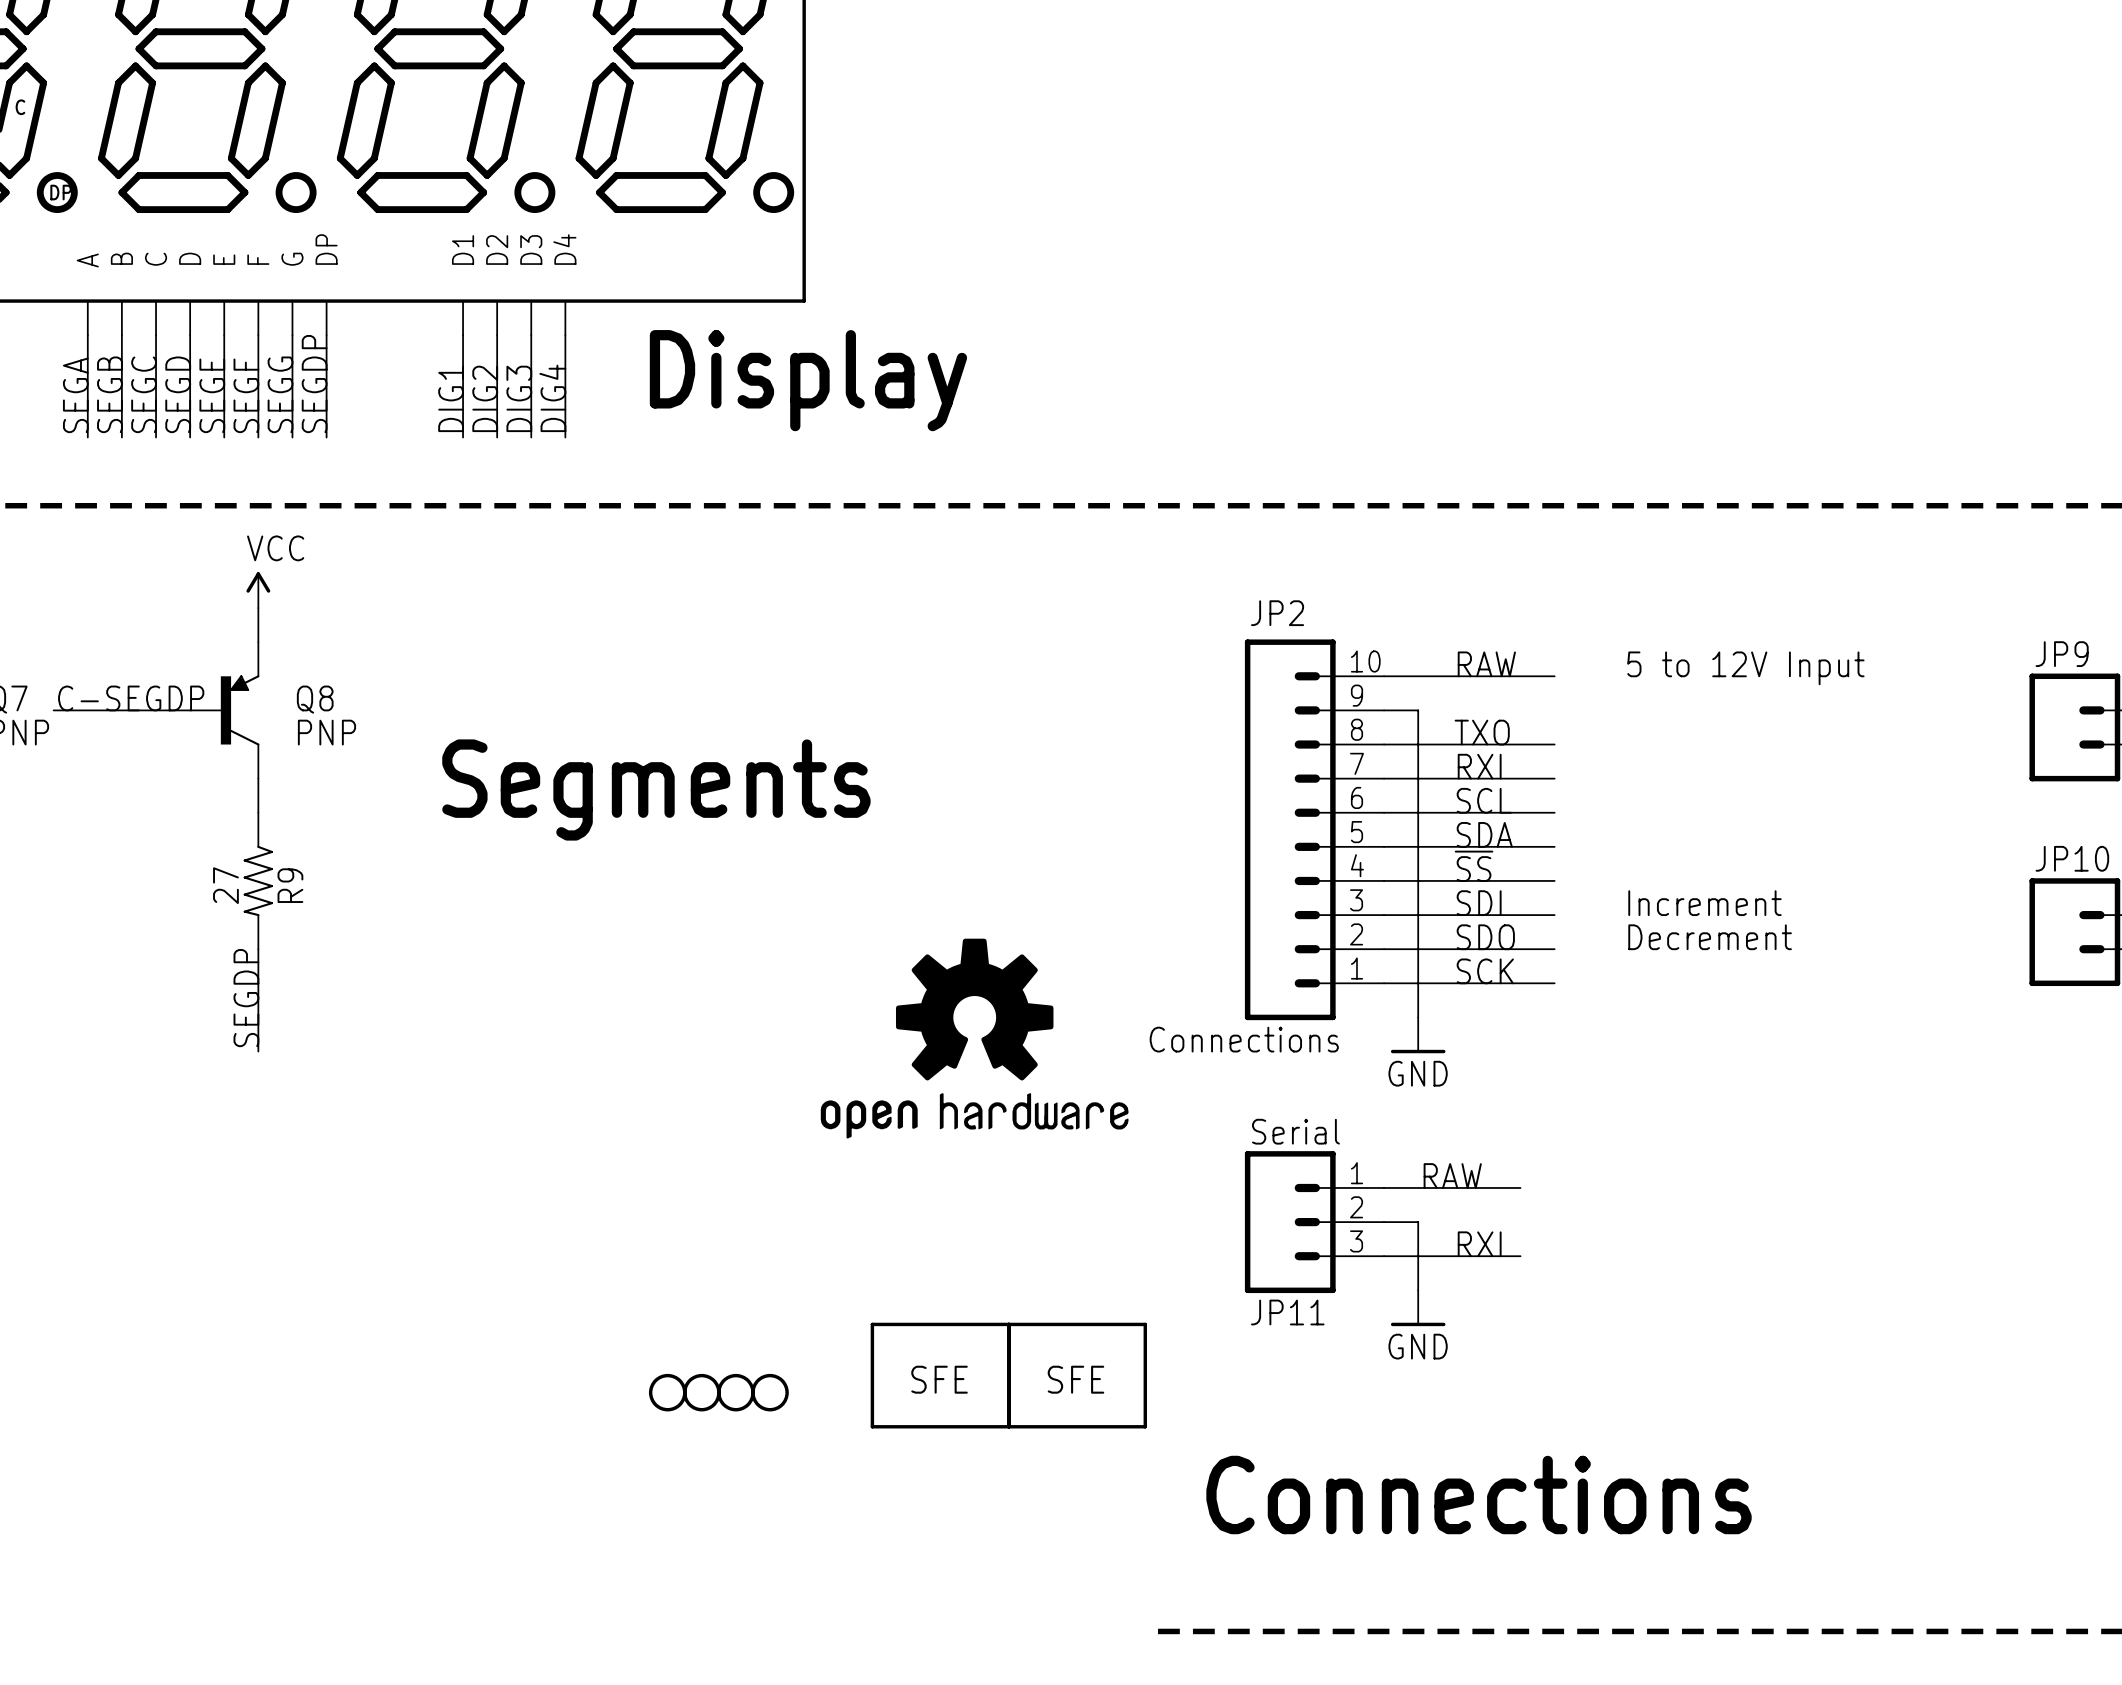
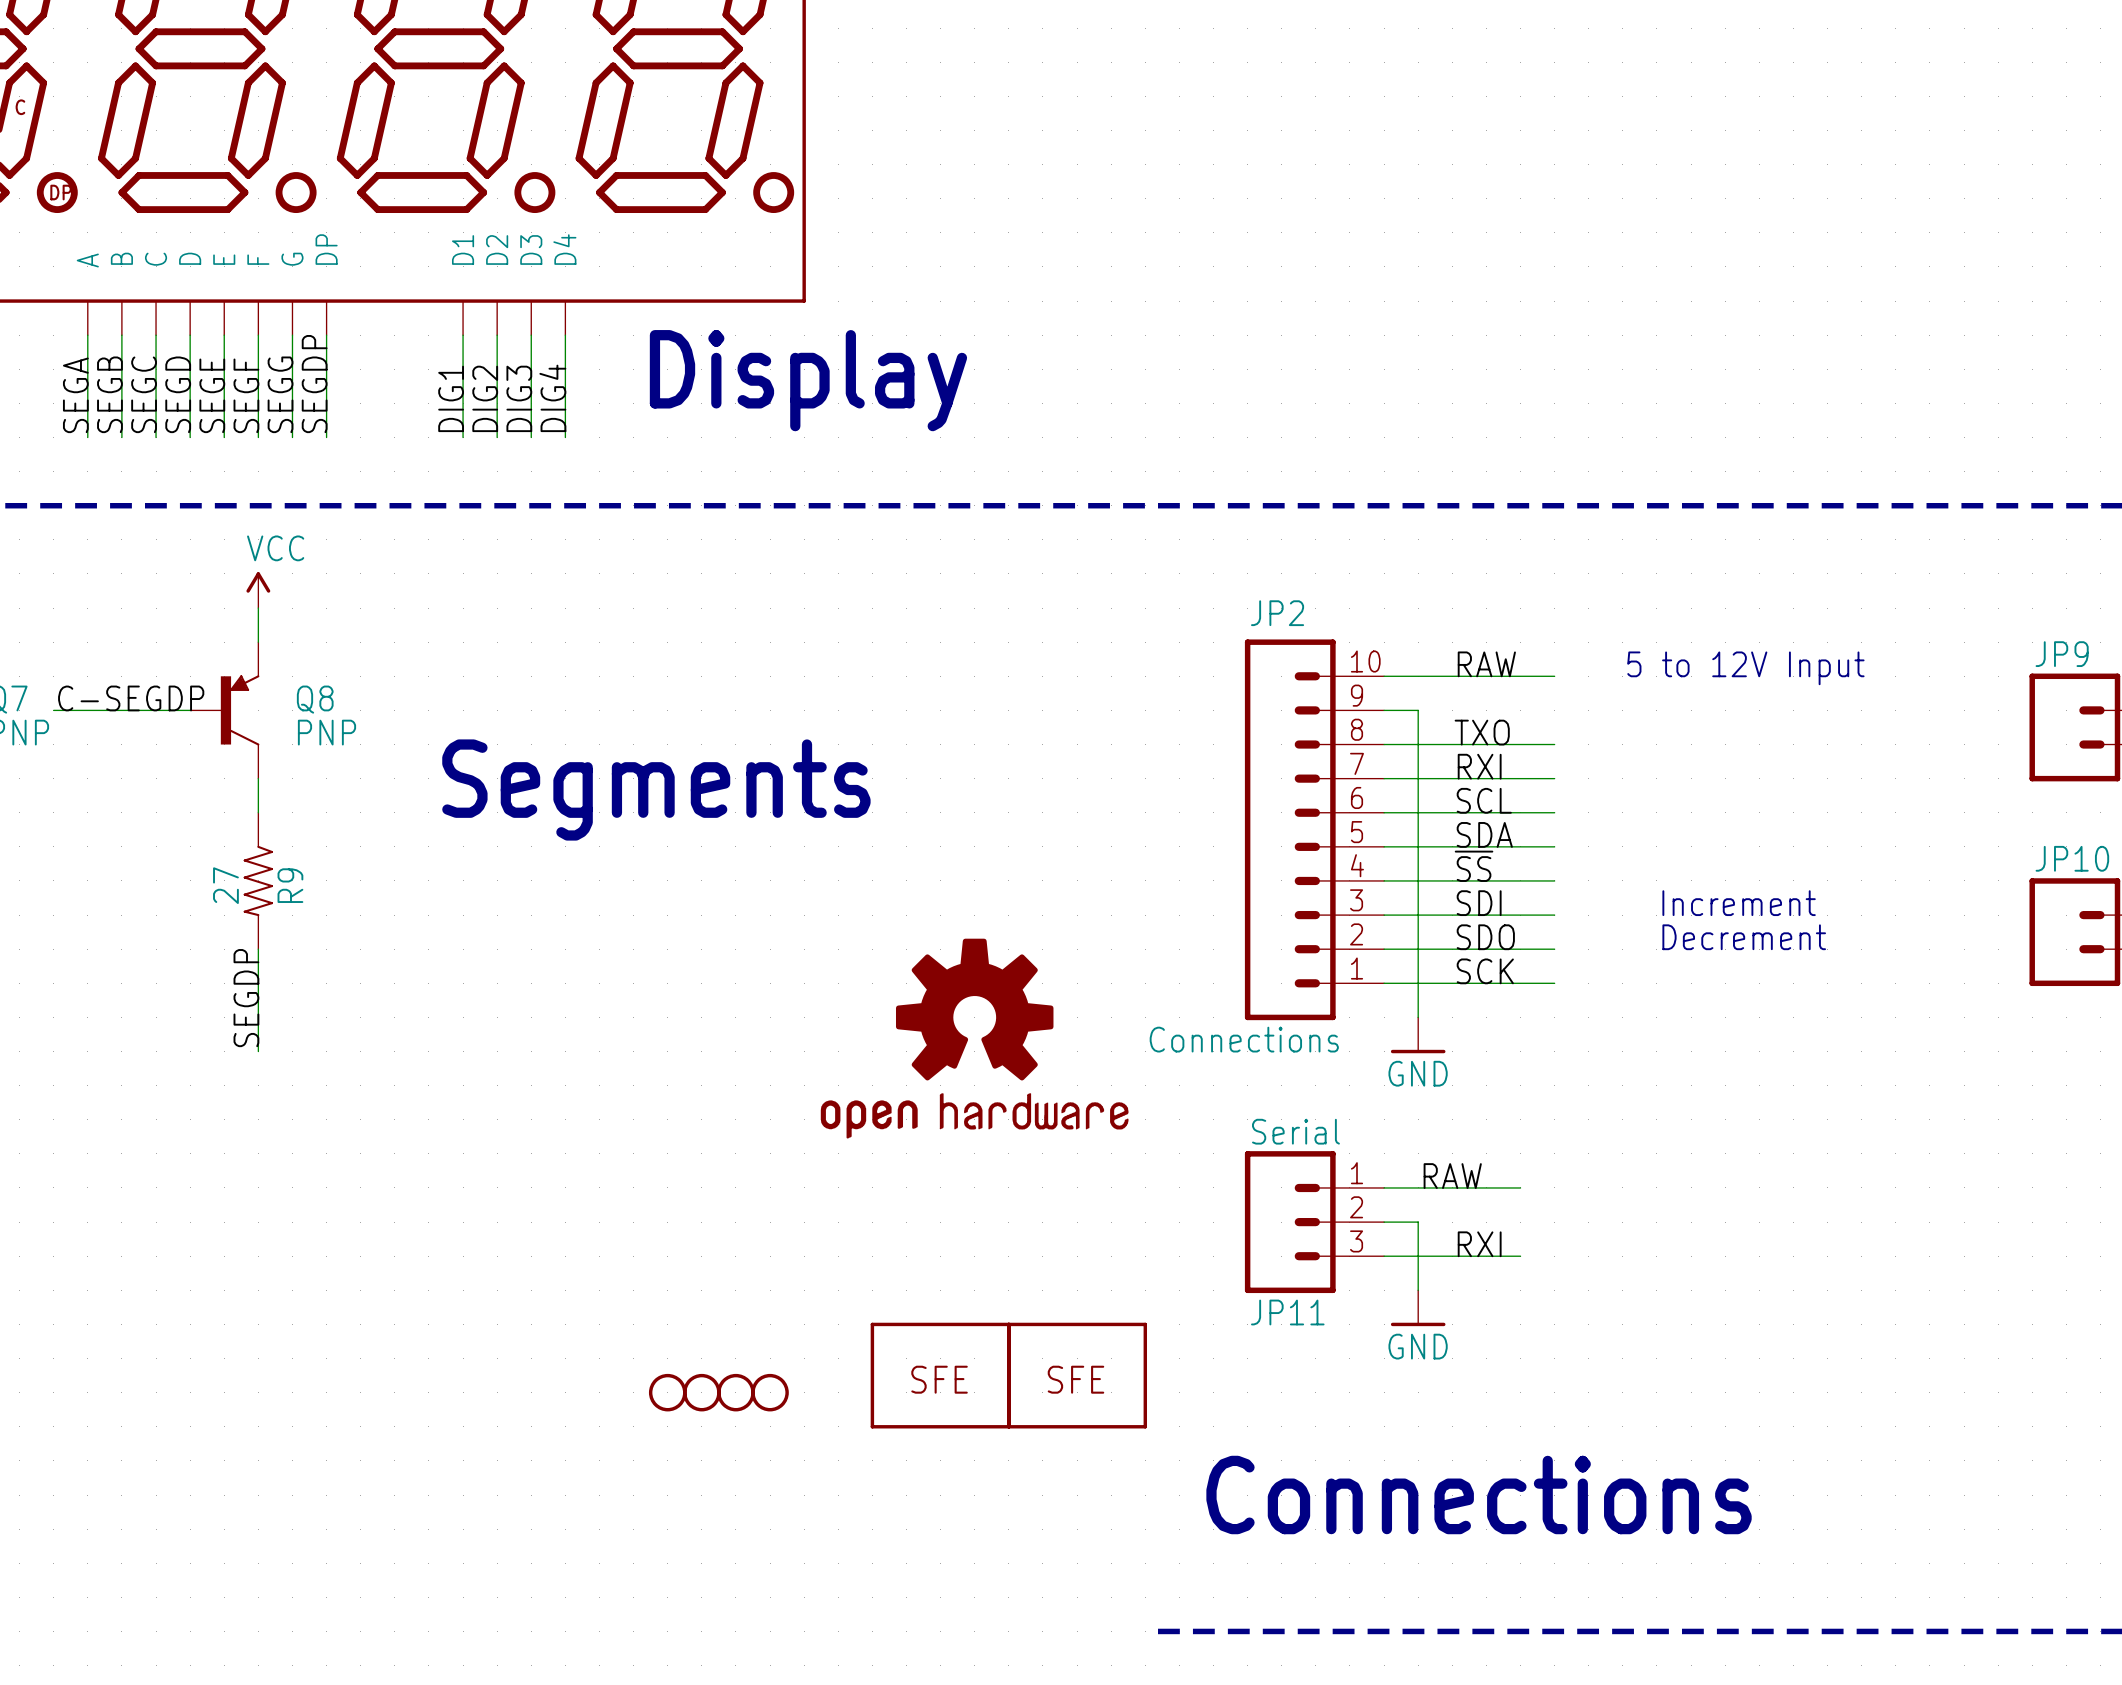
text position: Increment (1704, 903) -> Increment (1739, 903)
text position: Decrement (1710, 937) -> Decrement (1744, 937)

